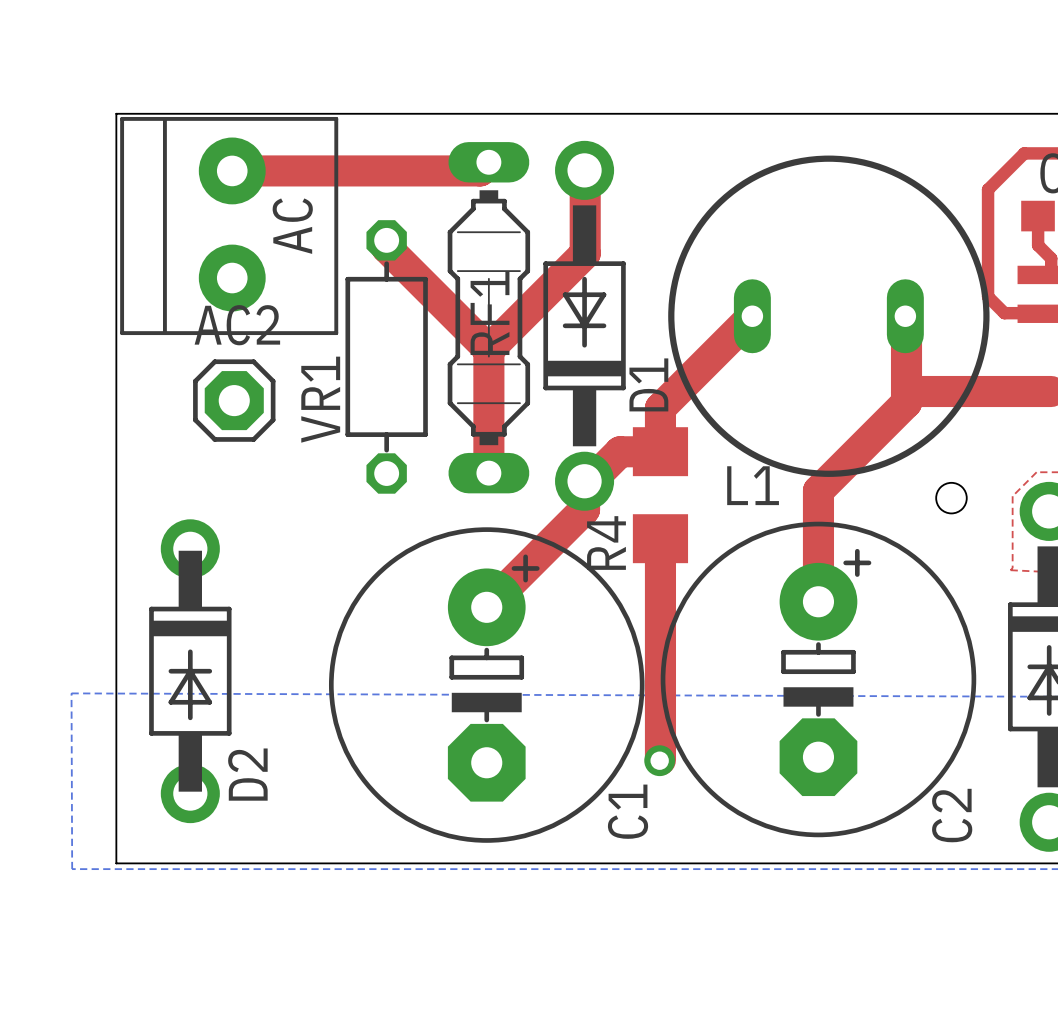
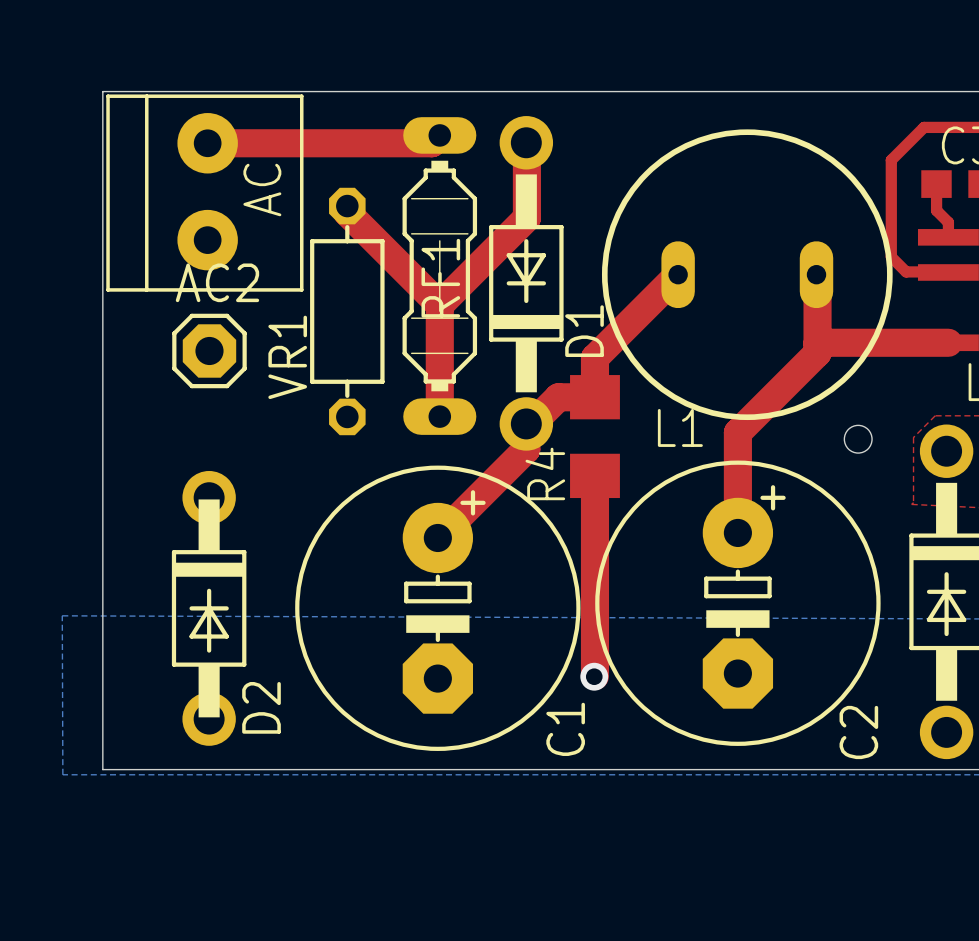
D2 position: (190, 671) -> (209, 608)

